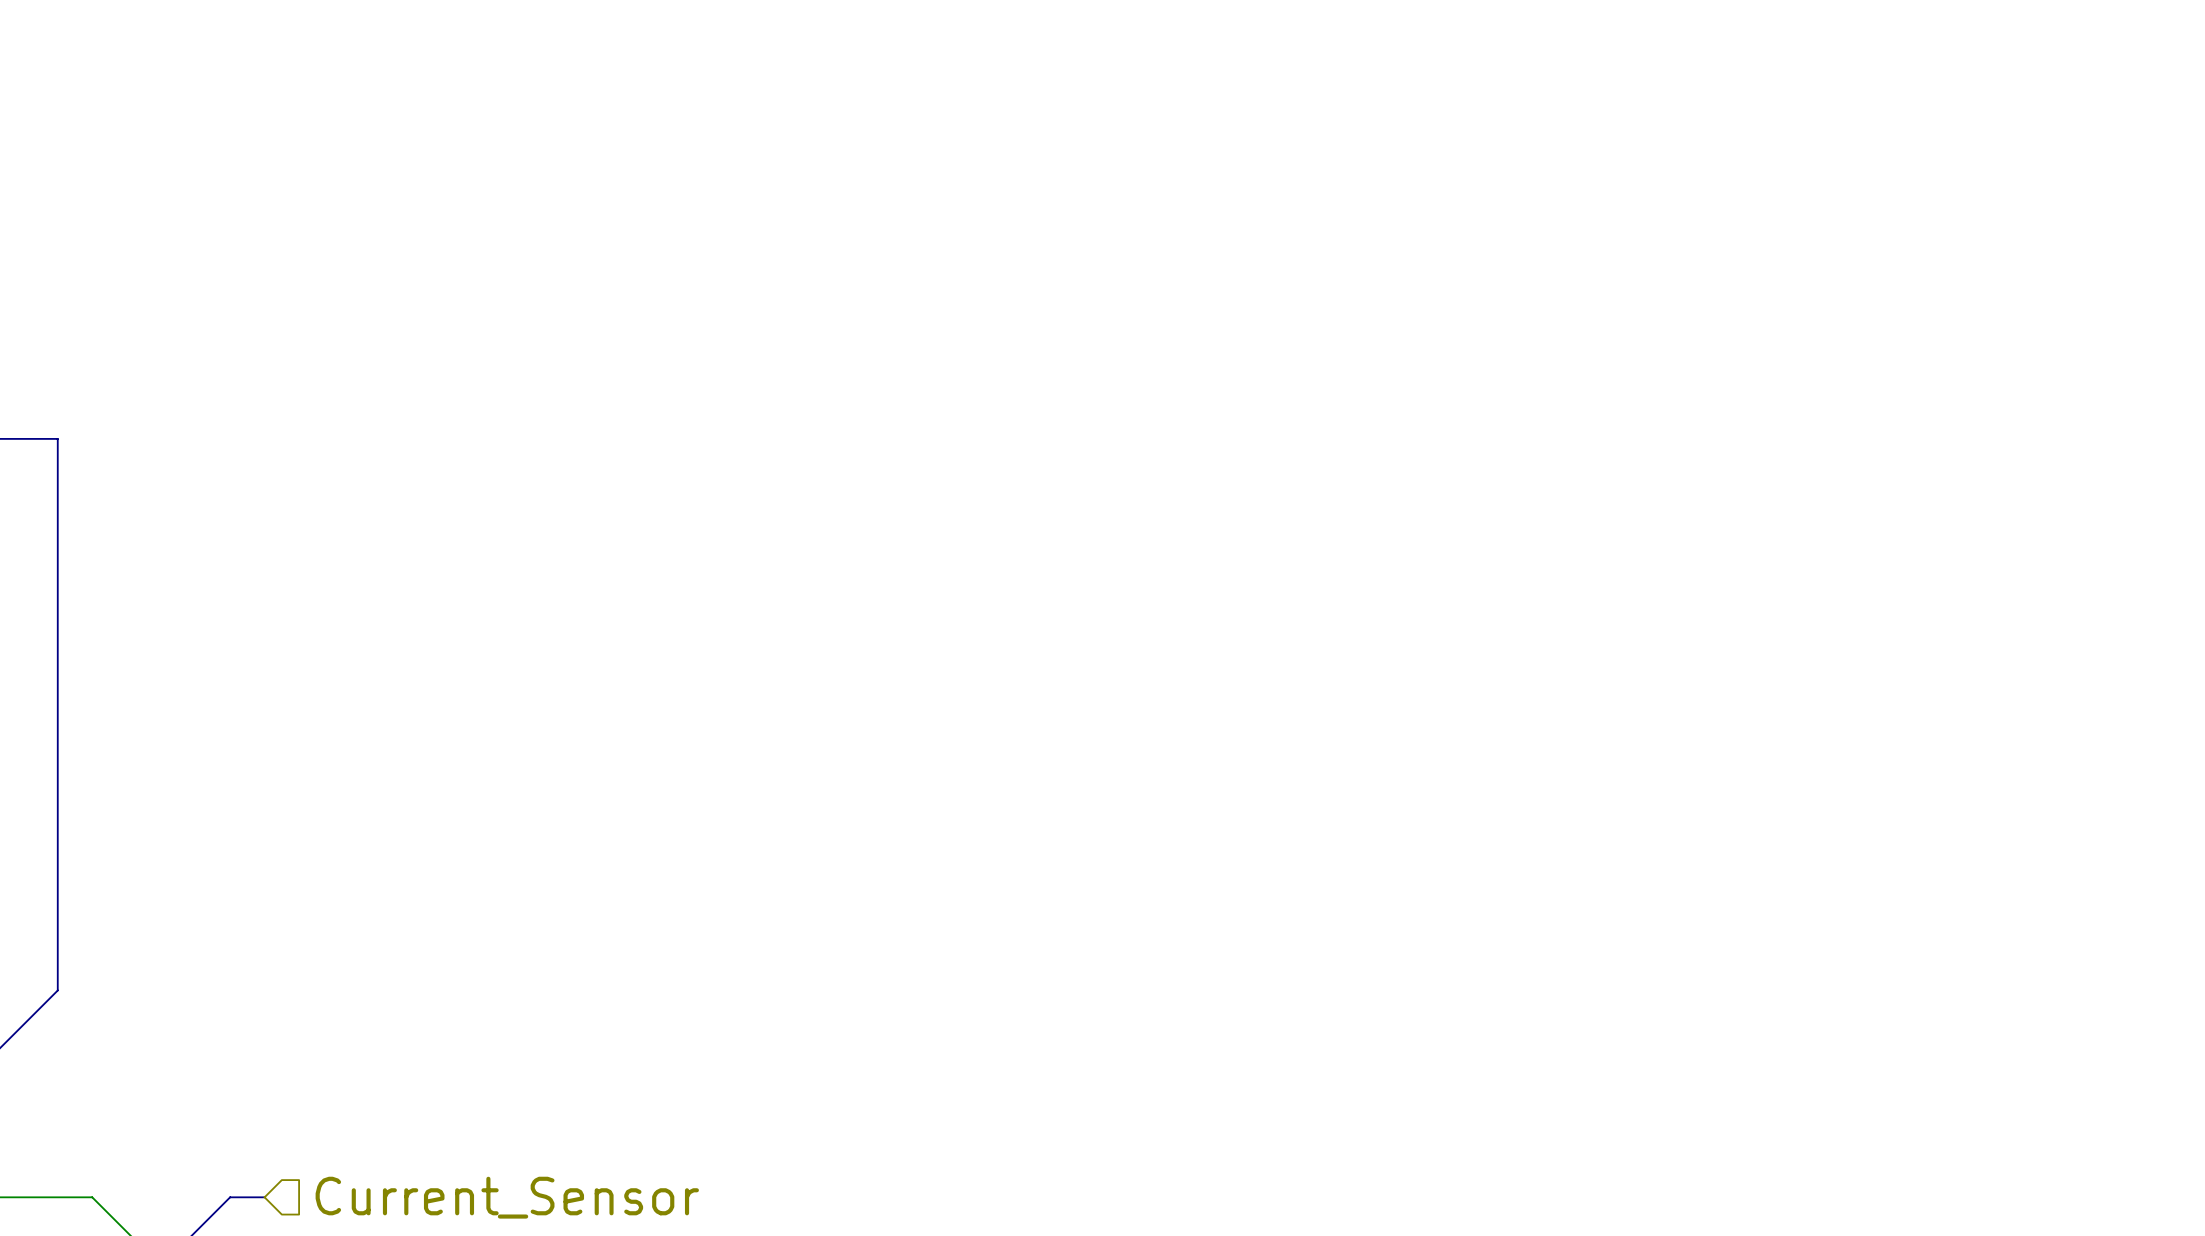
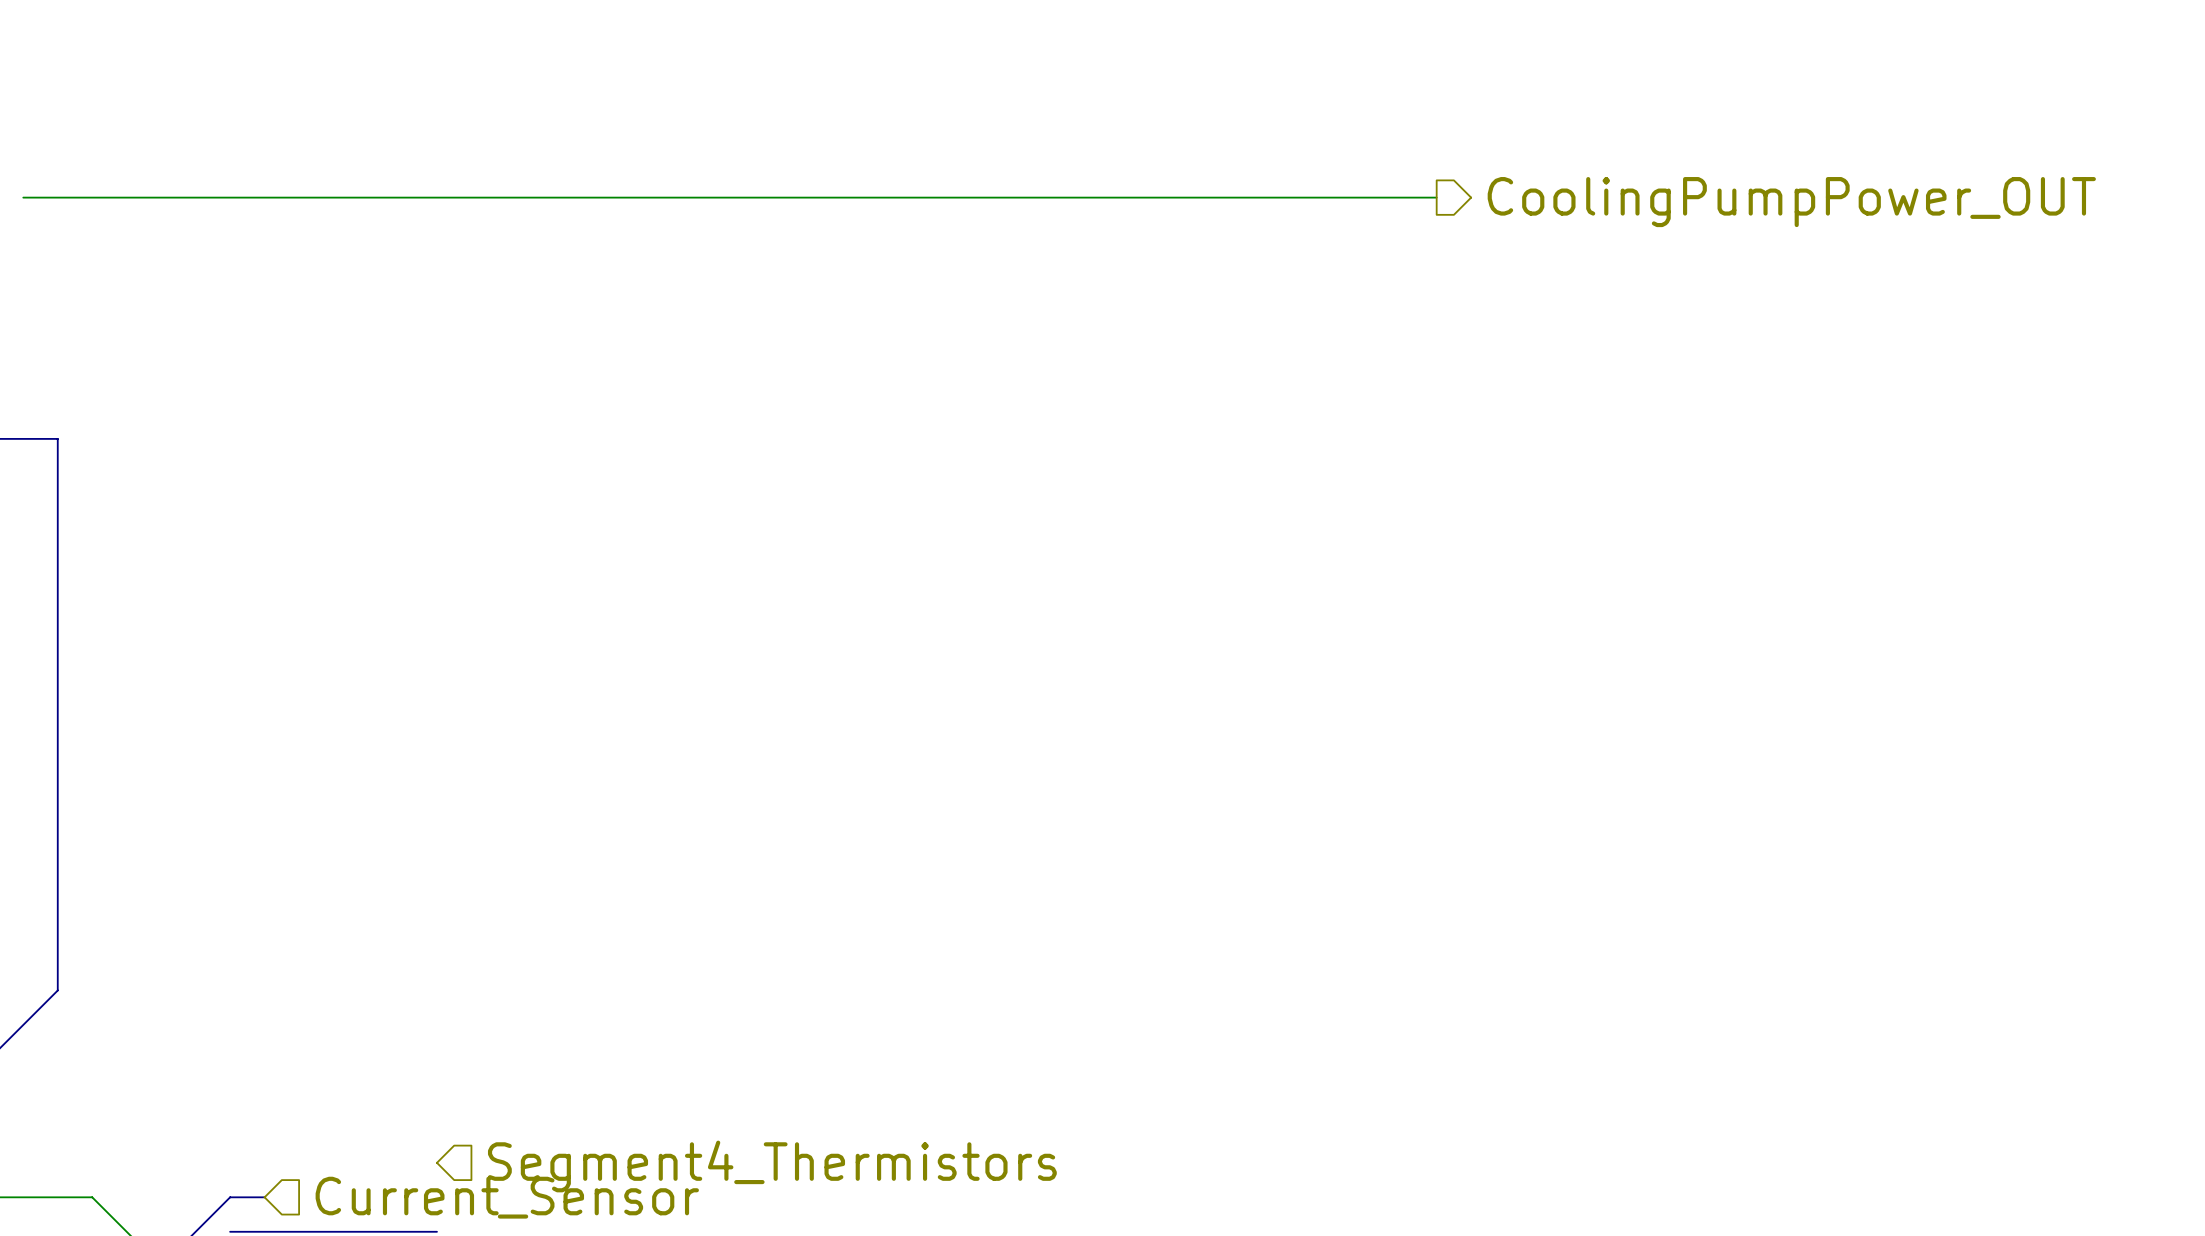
wire: none -> (23, 197) (1436, 197)
hierarchical label: none -> CoolingPumpPower_OUT (1791, 202)
hierarchical label: none -> Segment4_Thermistors (772, 1166)
bus: none -> (230, 1231) (436, 1231)

